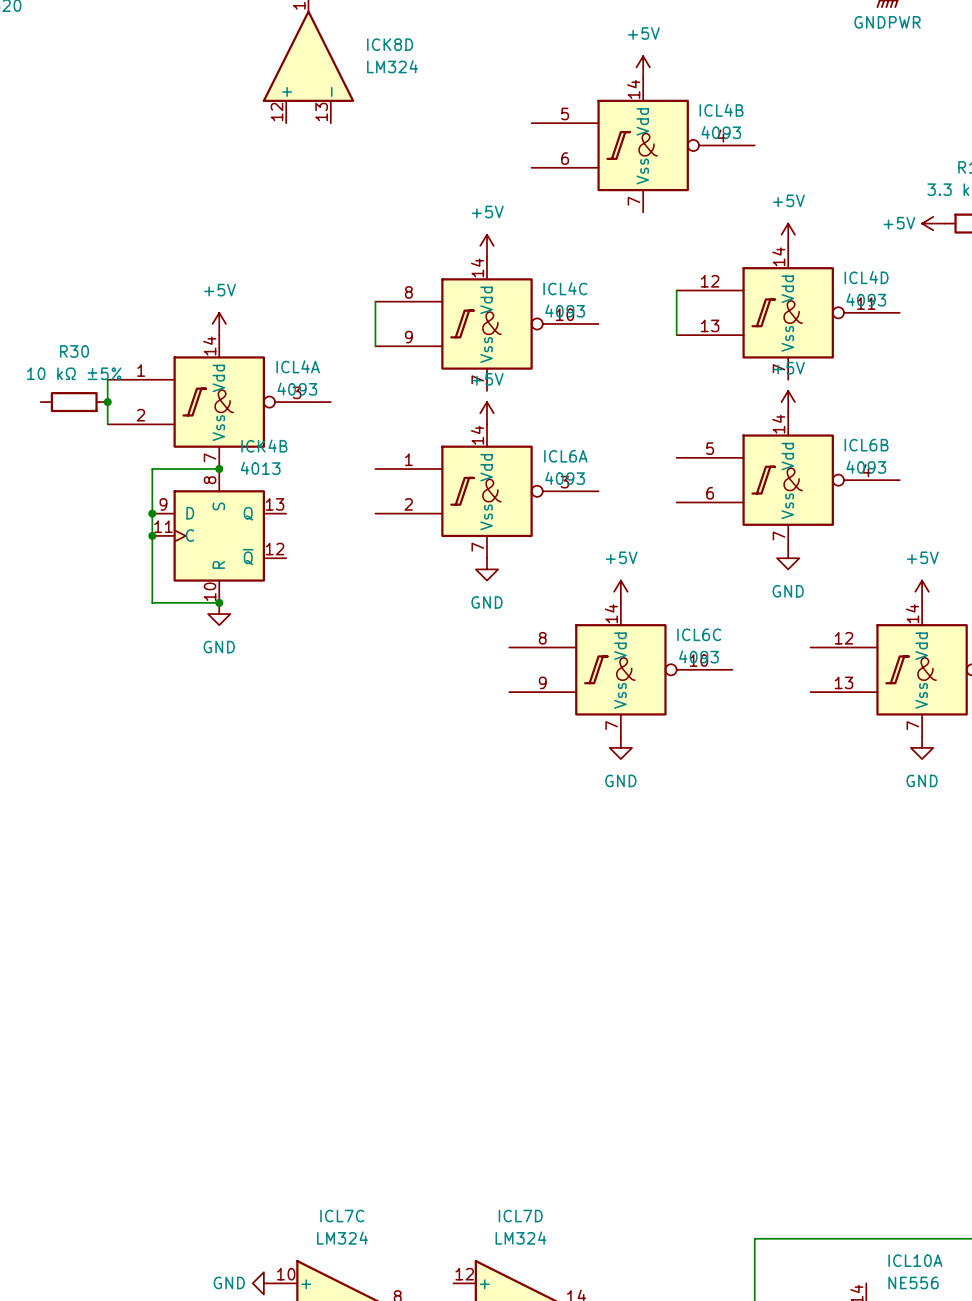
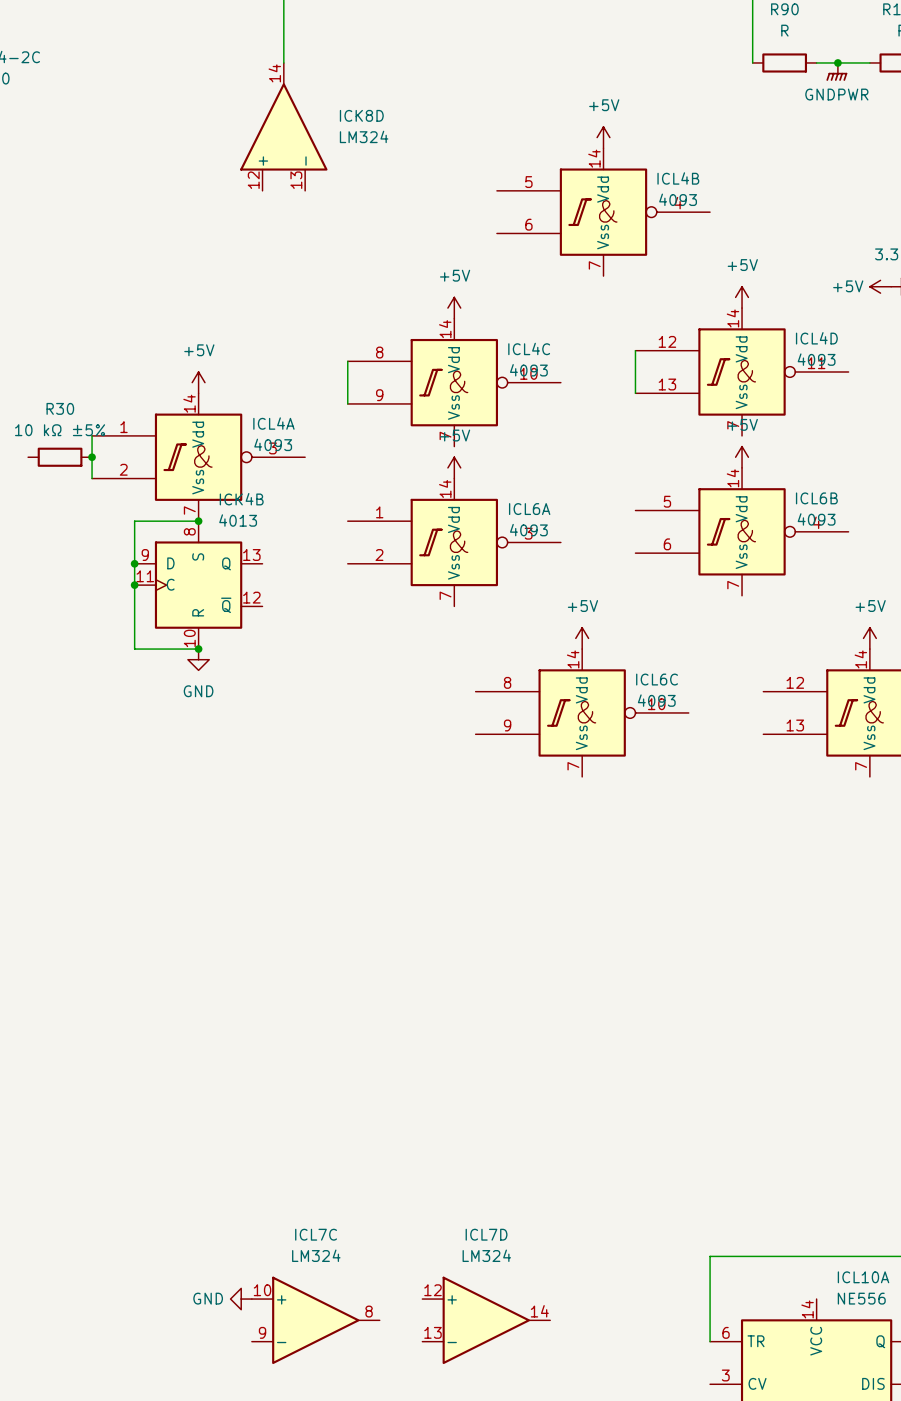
power symbol: GND (788, 558) -> none
power symbol: GND (487, 569) -> none
power symbol: GND (620, 747) -> none
power symbol: GND (922, 747) -> none

